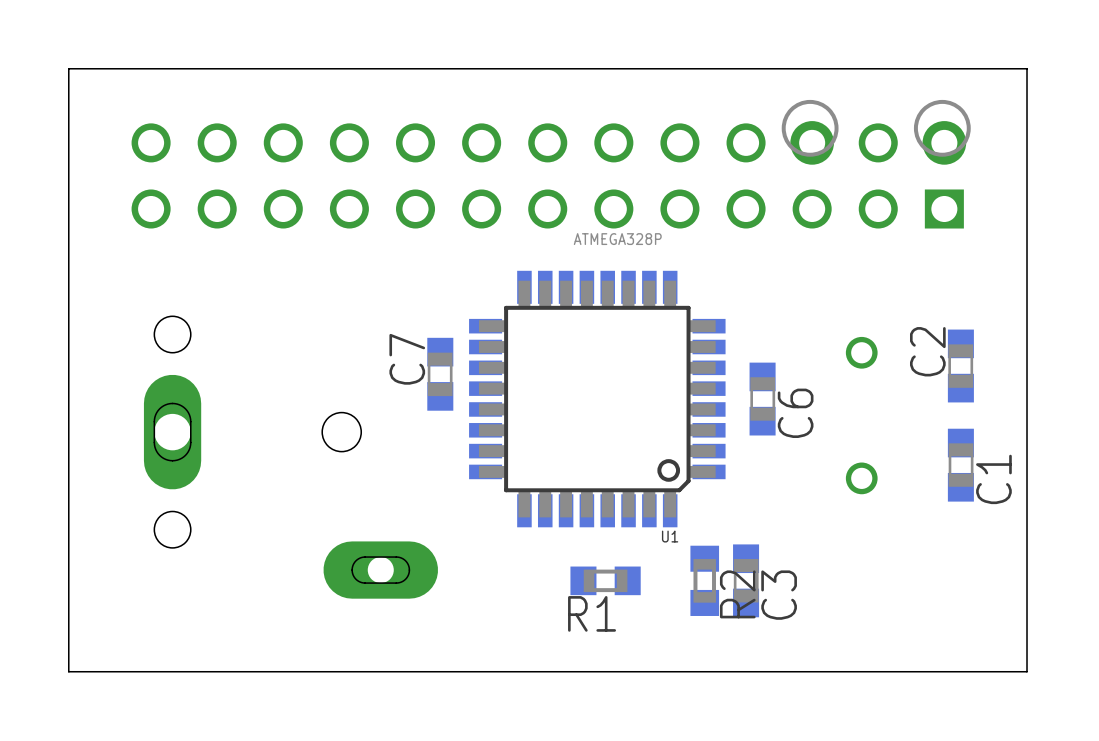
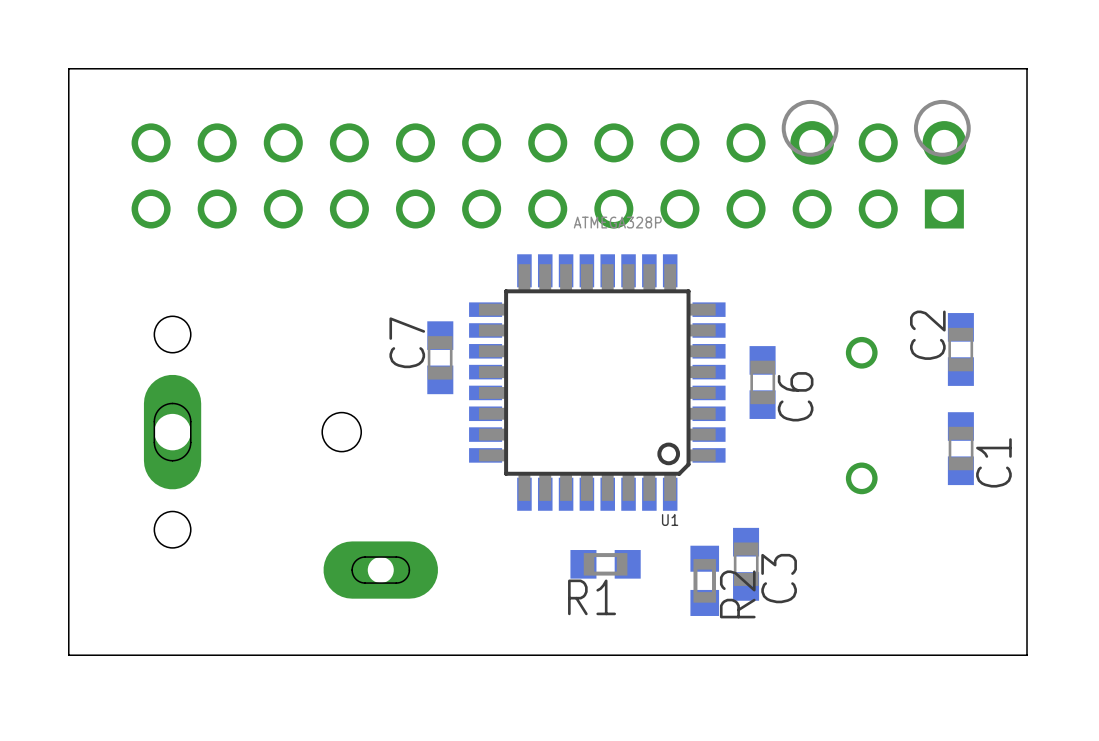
C2 position: (960, 366) -> (960, 349)
C7 position: (440, 374) -> (440, 357)
U1 position: (597, 399) -> (597, 382)
C6 position: (762, 399) -> (762, 382)
C1 position: (960, 465) -> (960, 448)
R1 position: (605, 580) -> (605, 564)
C3 position: (746, 580) -> (746, 564)
board edge: (1027, 655) (1027, 671) (68, 671) (68, 655) -> (1027, 655) (68, 655)

